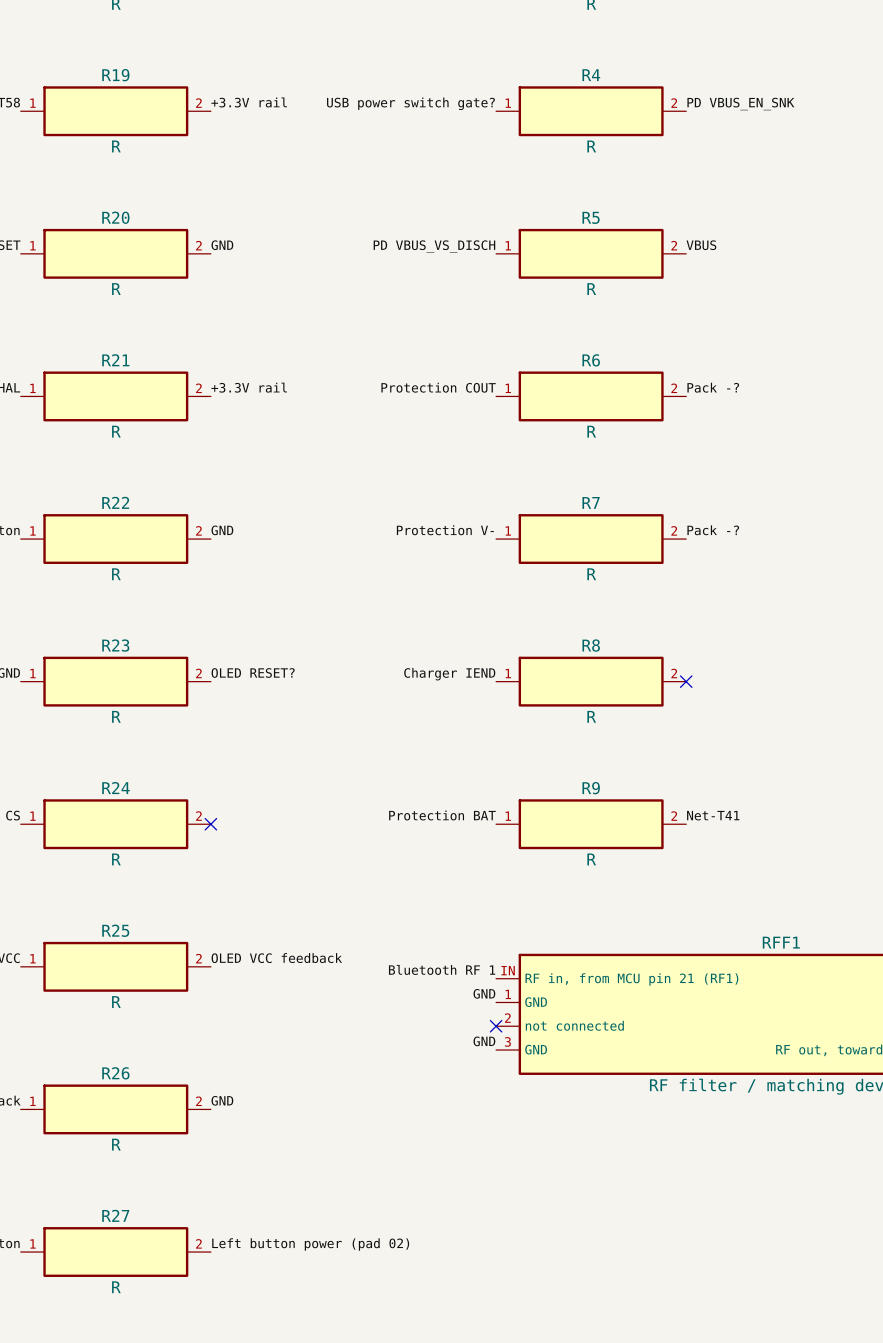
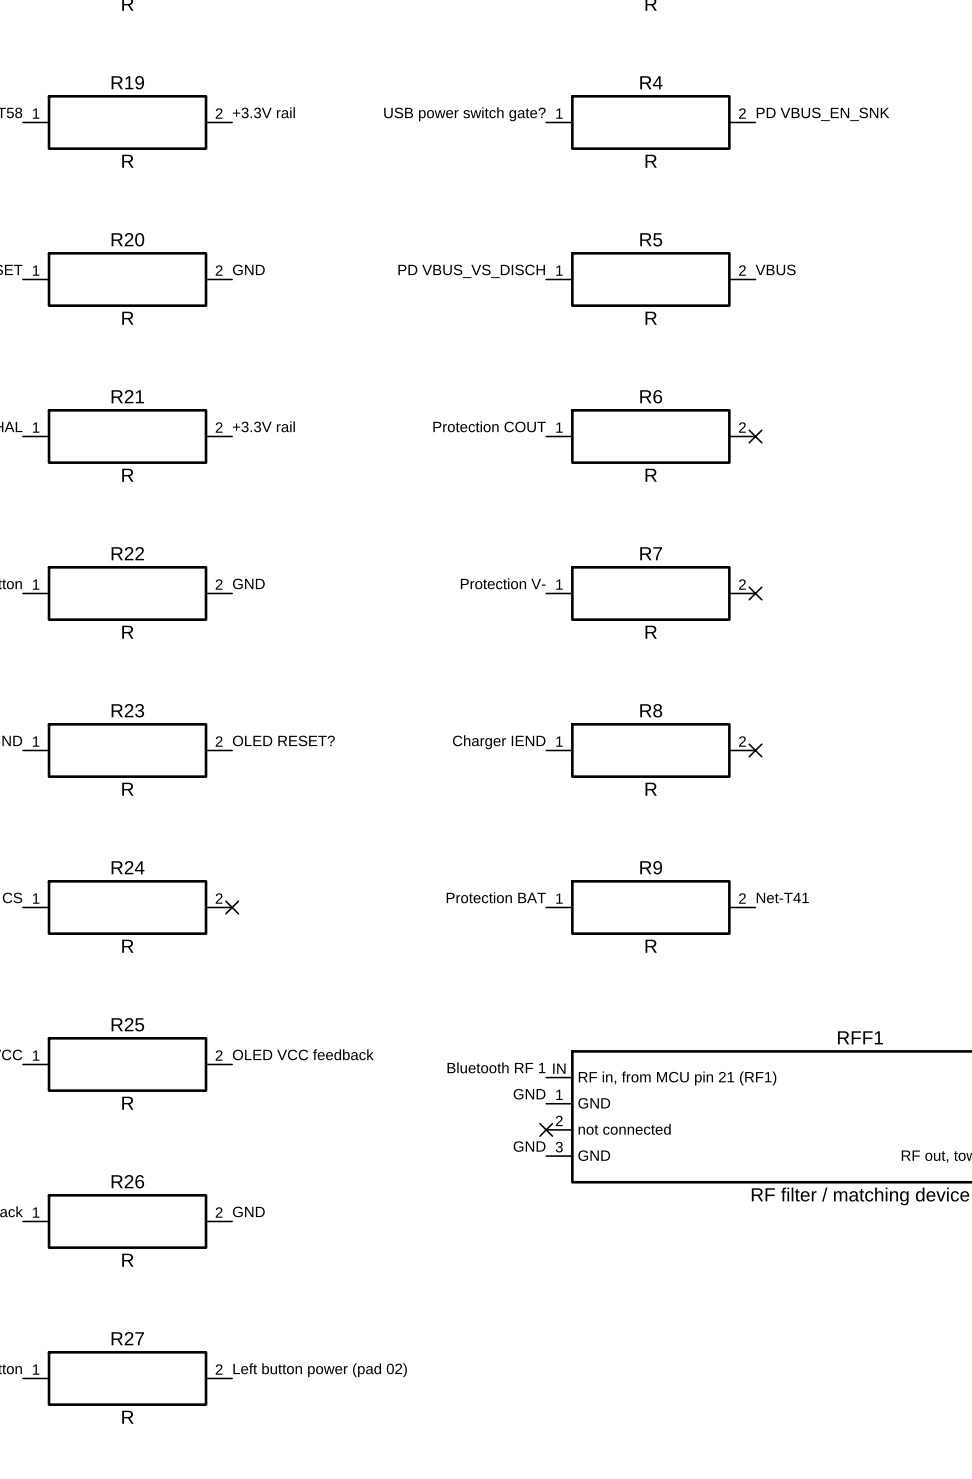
label: Pack -? (713, 387) -> none
no-connect mark: none -> (755, 436)
label: Pack -? (713, 530) -> none
no-connect mark: none -> (755, 593)

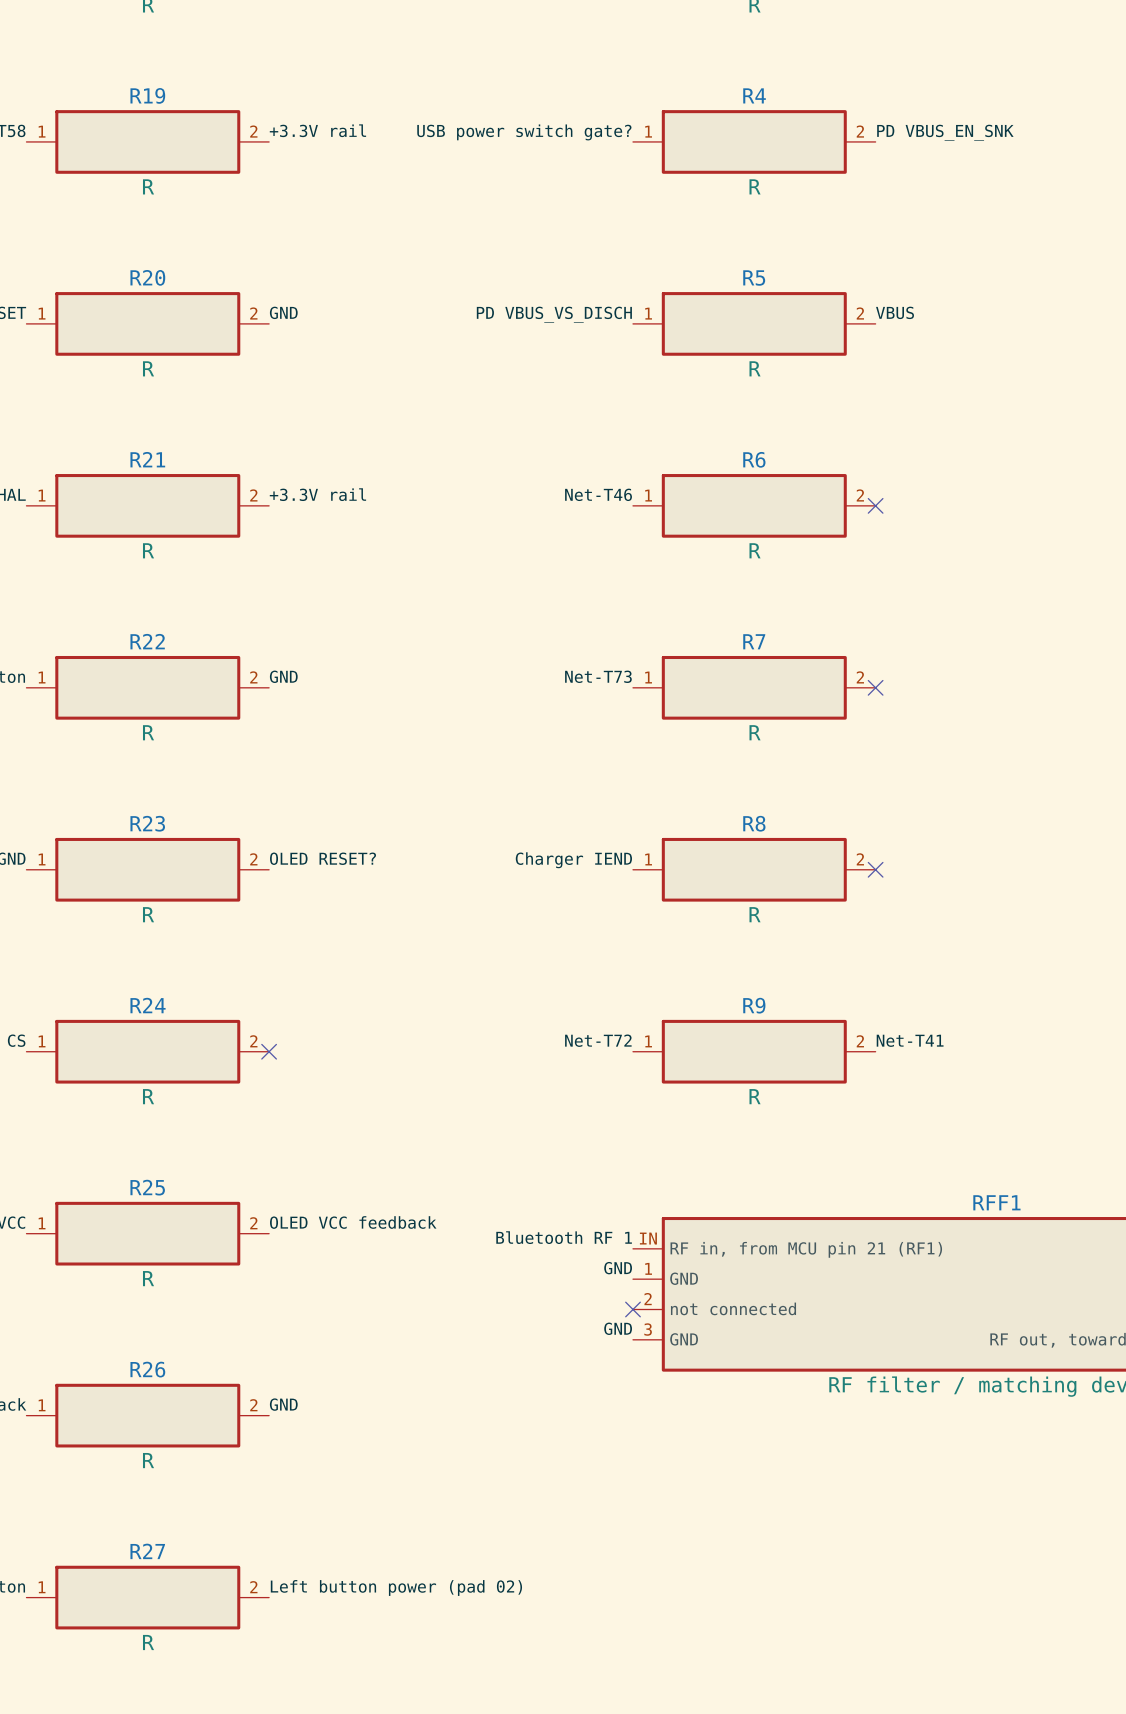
label: Protection COUT (489, 426) -> Net-T46 (598, 494)
label: Protection V- (503, 583) -> Net-T73 (598, 676)
label: Protection BAT (496, 897) -> Net-T72 (598, 1040)

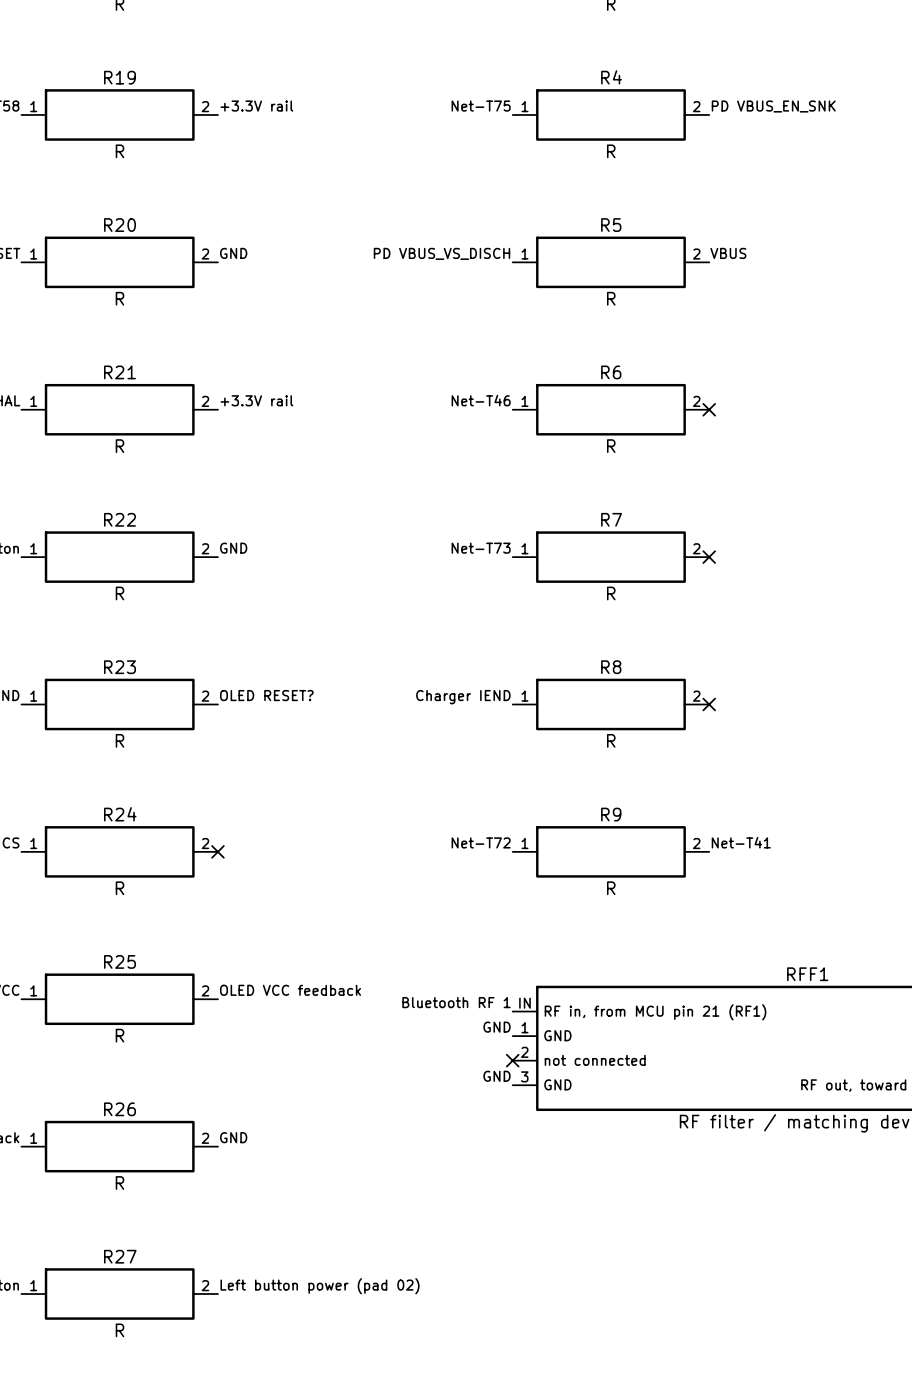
label: USB power switch gate? (524, 132) -> Net-T75 (481, 106)

